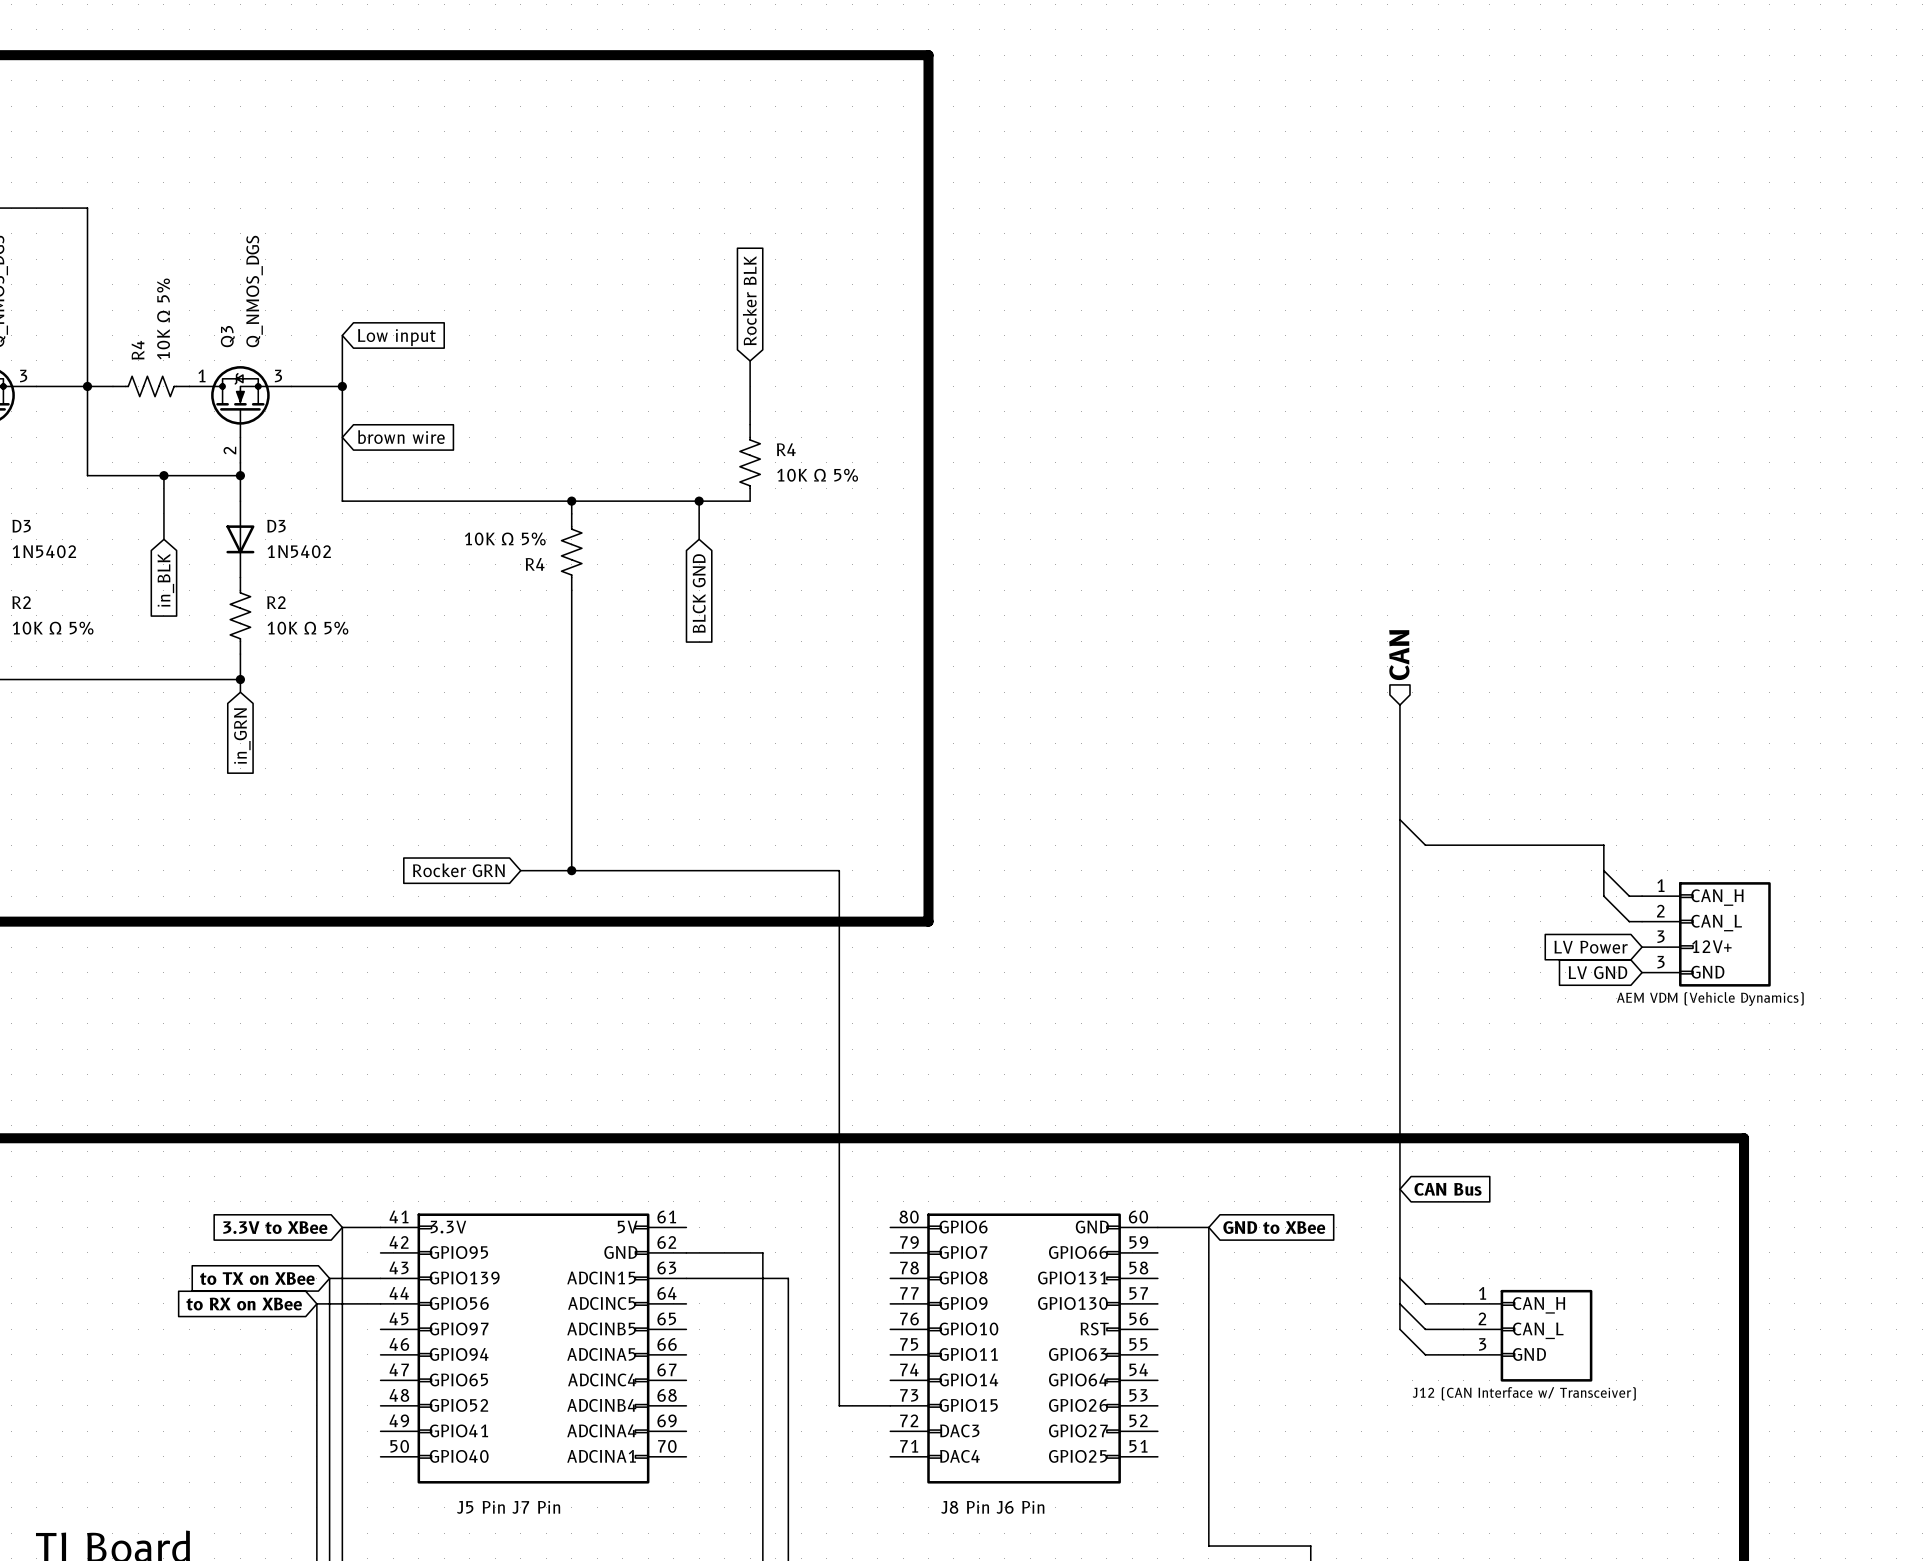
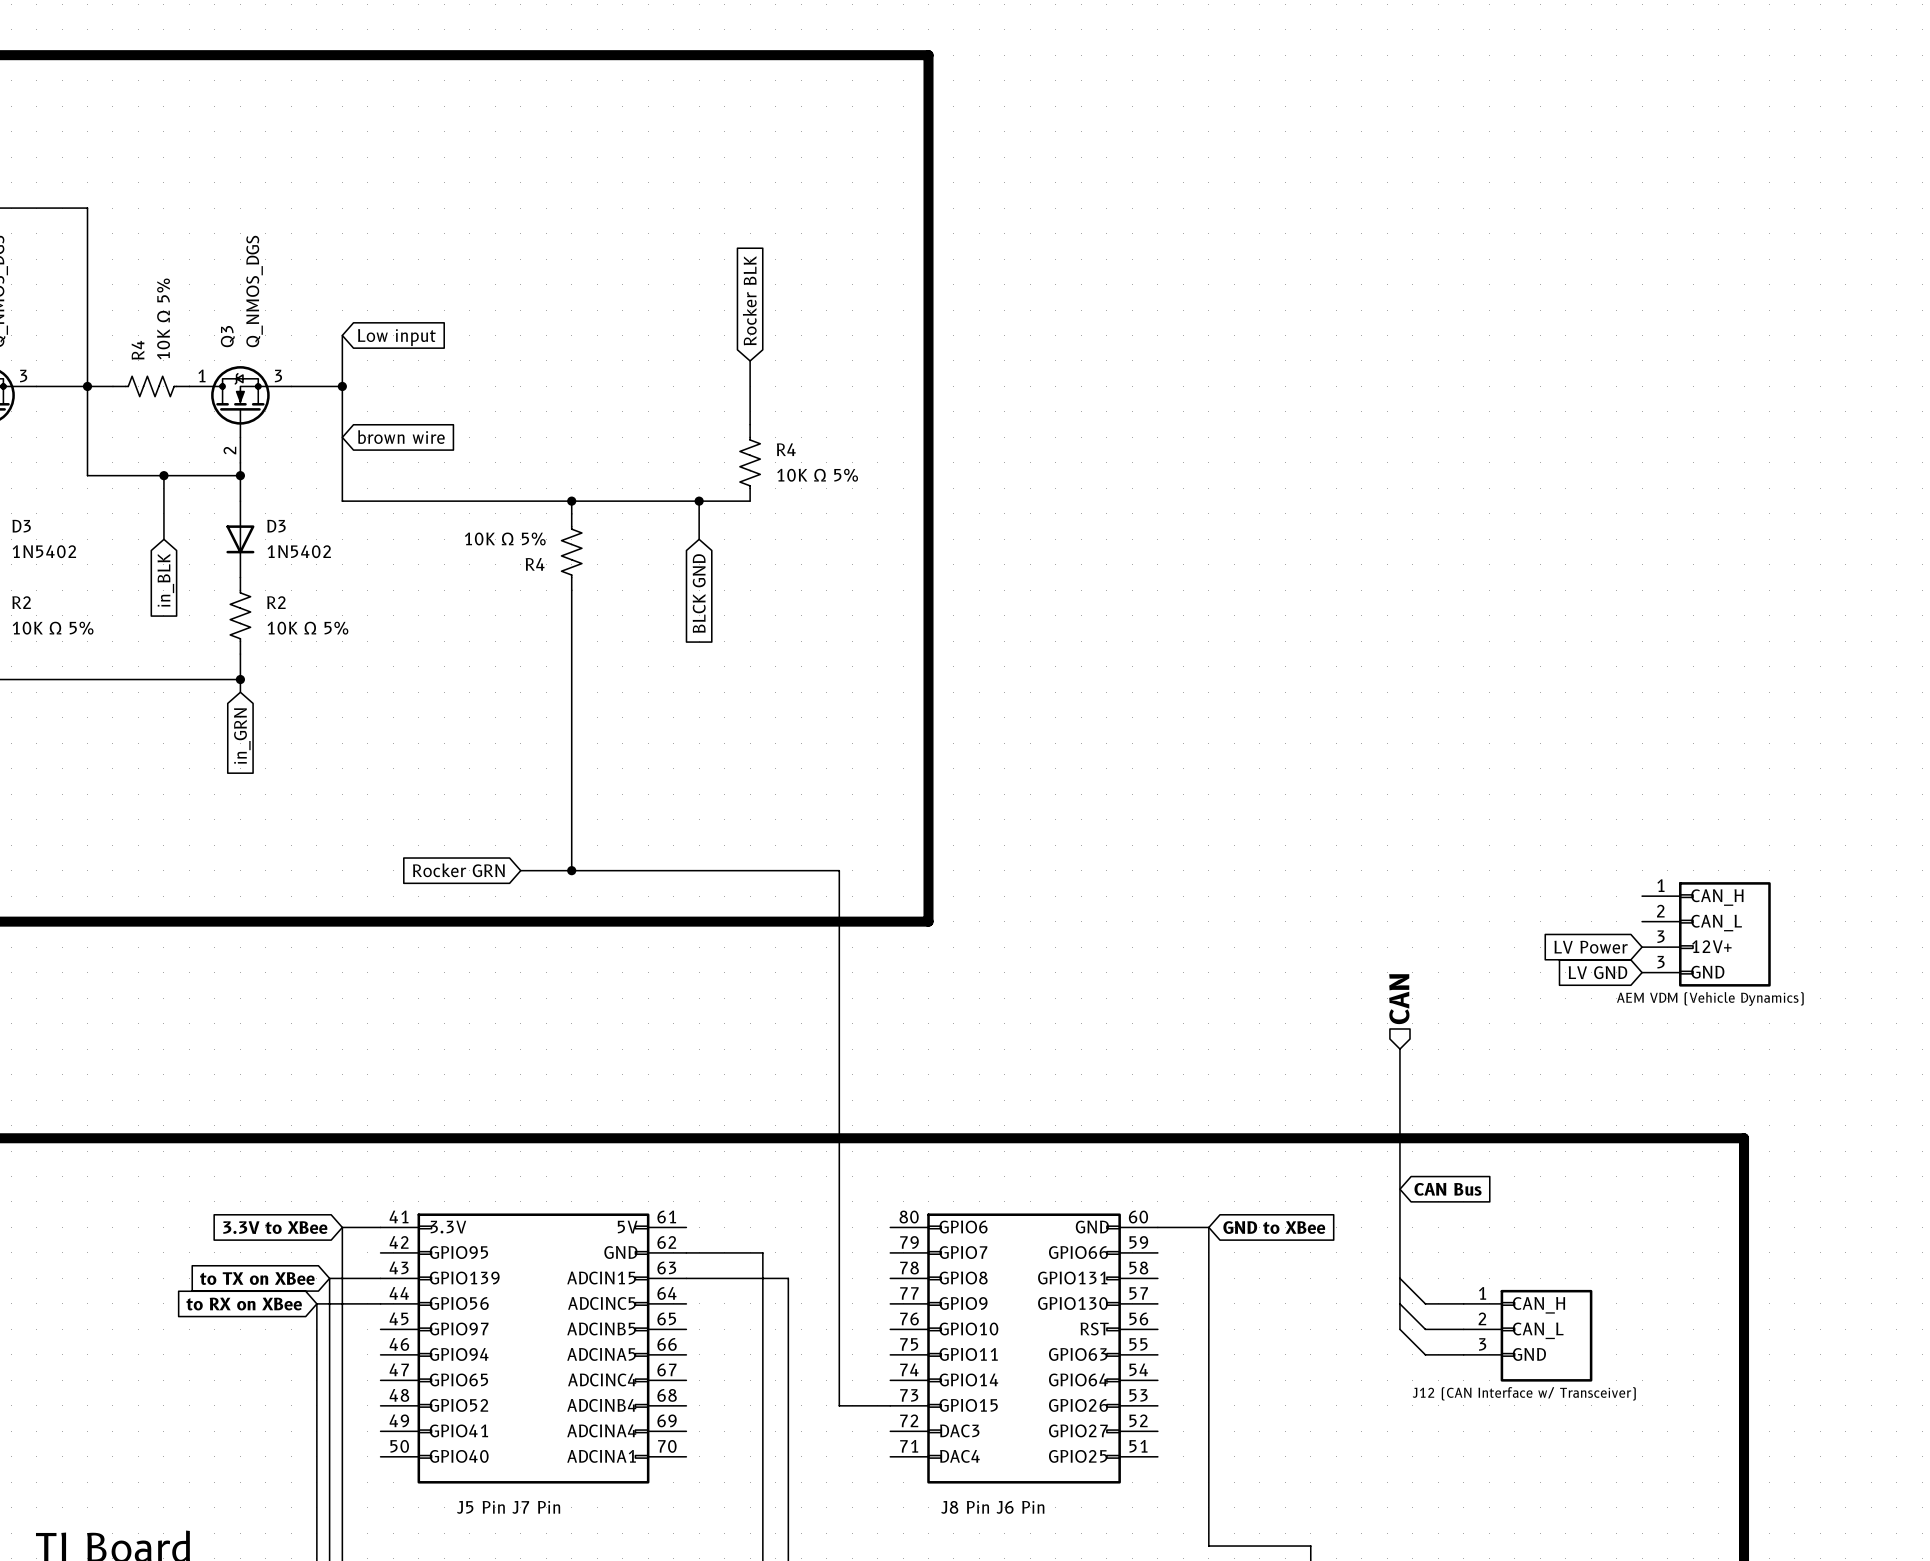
hierarchical label: CAN (1399, 655) -> none
bus: (1399, 705) (1399, 1049) -> none
wire: (1399, 819) (1425, 845) (1603, 845) (1603, 896) (1629, 921) (1642, 921) -> none
wire: (1603, 870) (1629, 896) (1642, 896) -> none
hierarchical label: none -> CAN (1399, 999)

